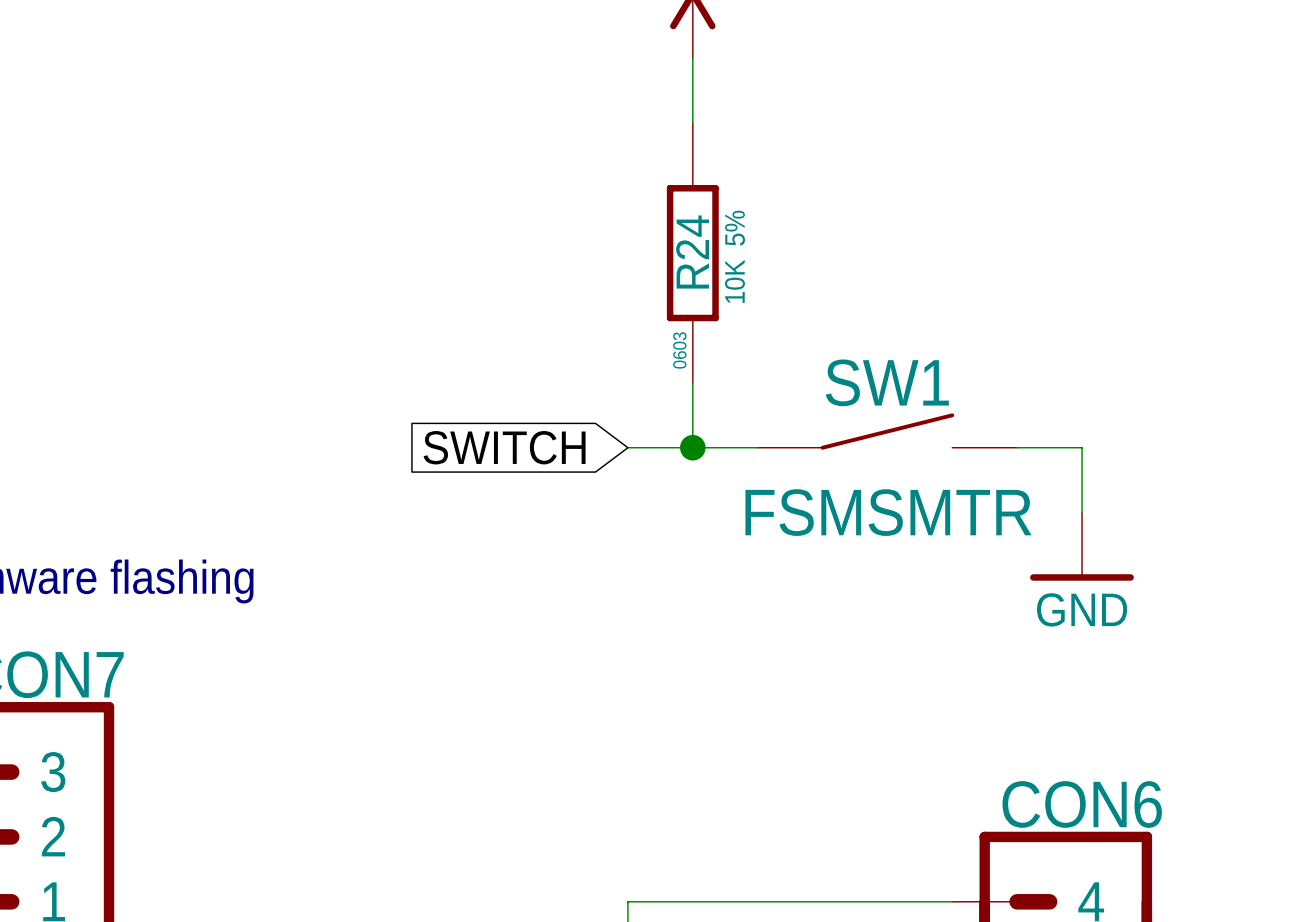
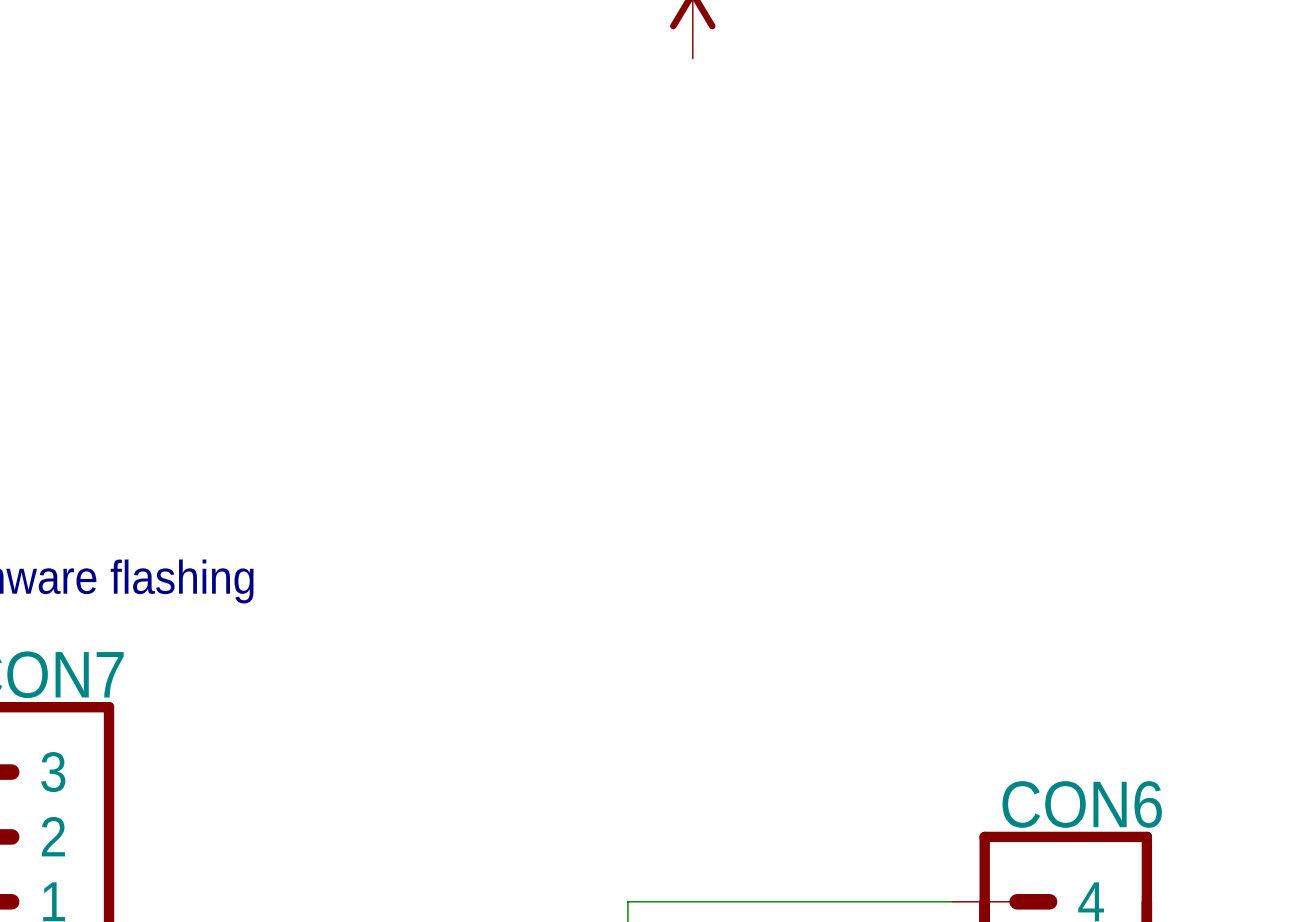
wire: (692, 58) (692, 123) -> none
R24: 10K (692, 253) -> none
wire: (692, 382) (692, 447) -> none
SW1: (887, 431) -> none
global label: SWITCH (504, 447) -> none
wire: (627, 447) (757, 447) -> none
junction: (692, 447) -> none
wire: (1017, 447) (1082, 447) (1082, 512) -> none
power symbol: GND (1082, 546) -> none

